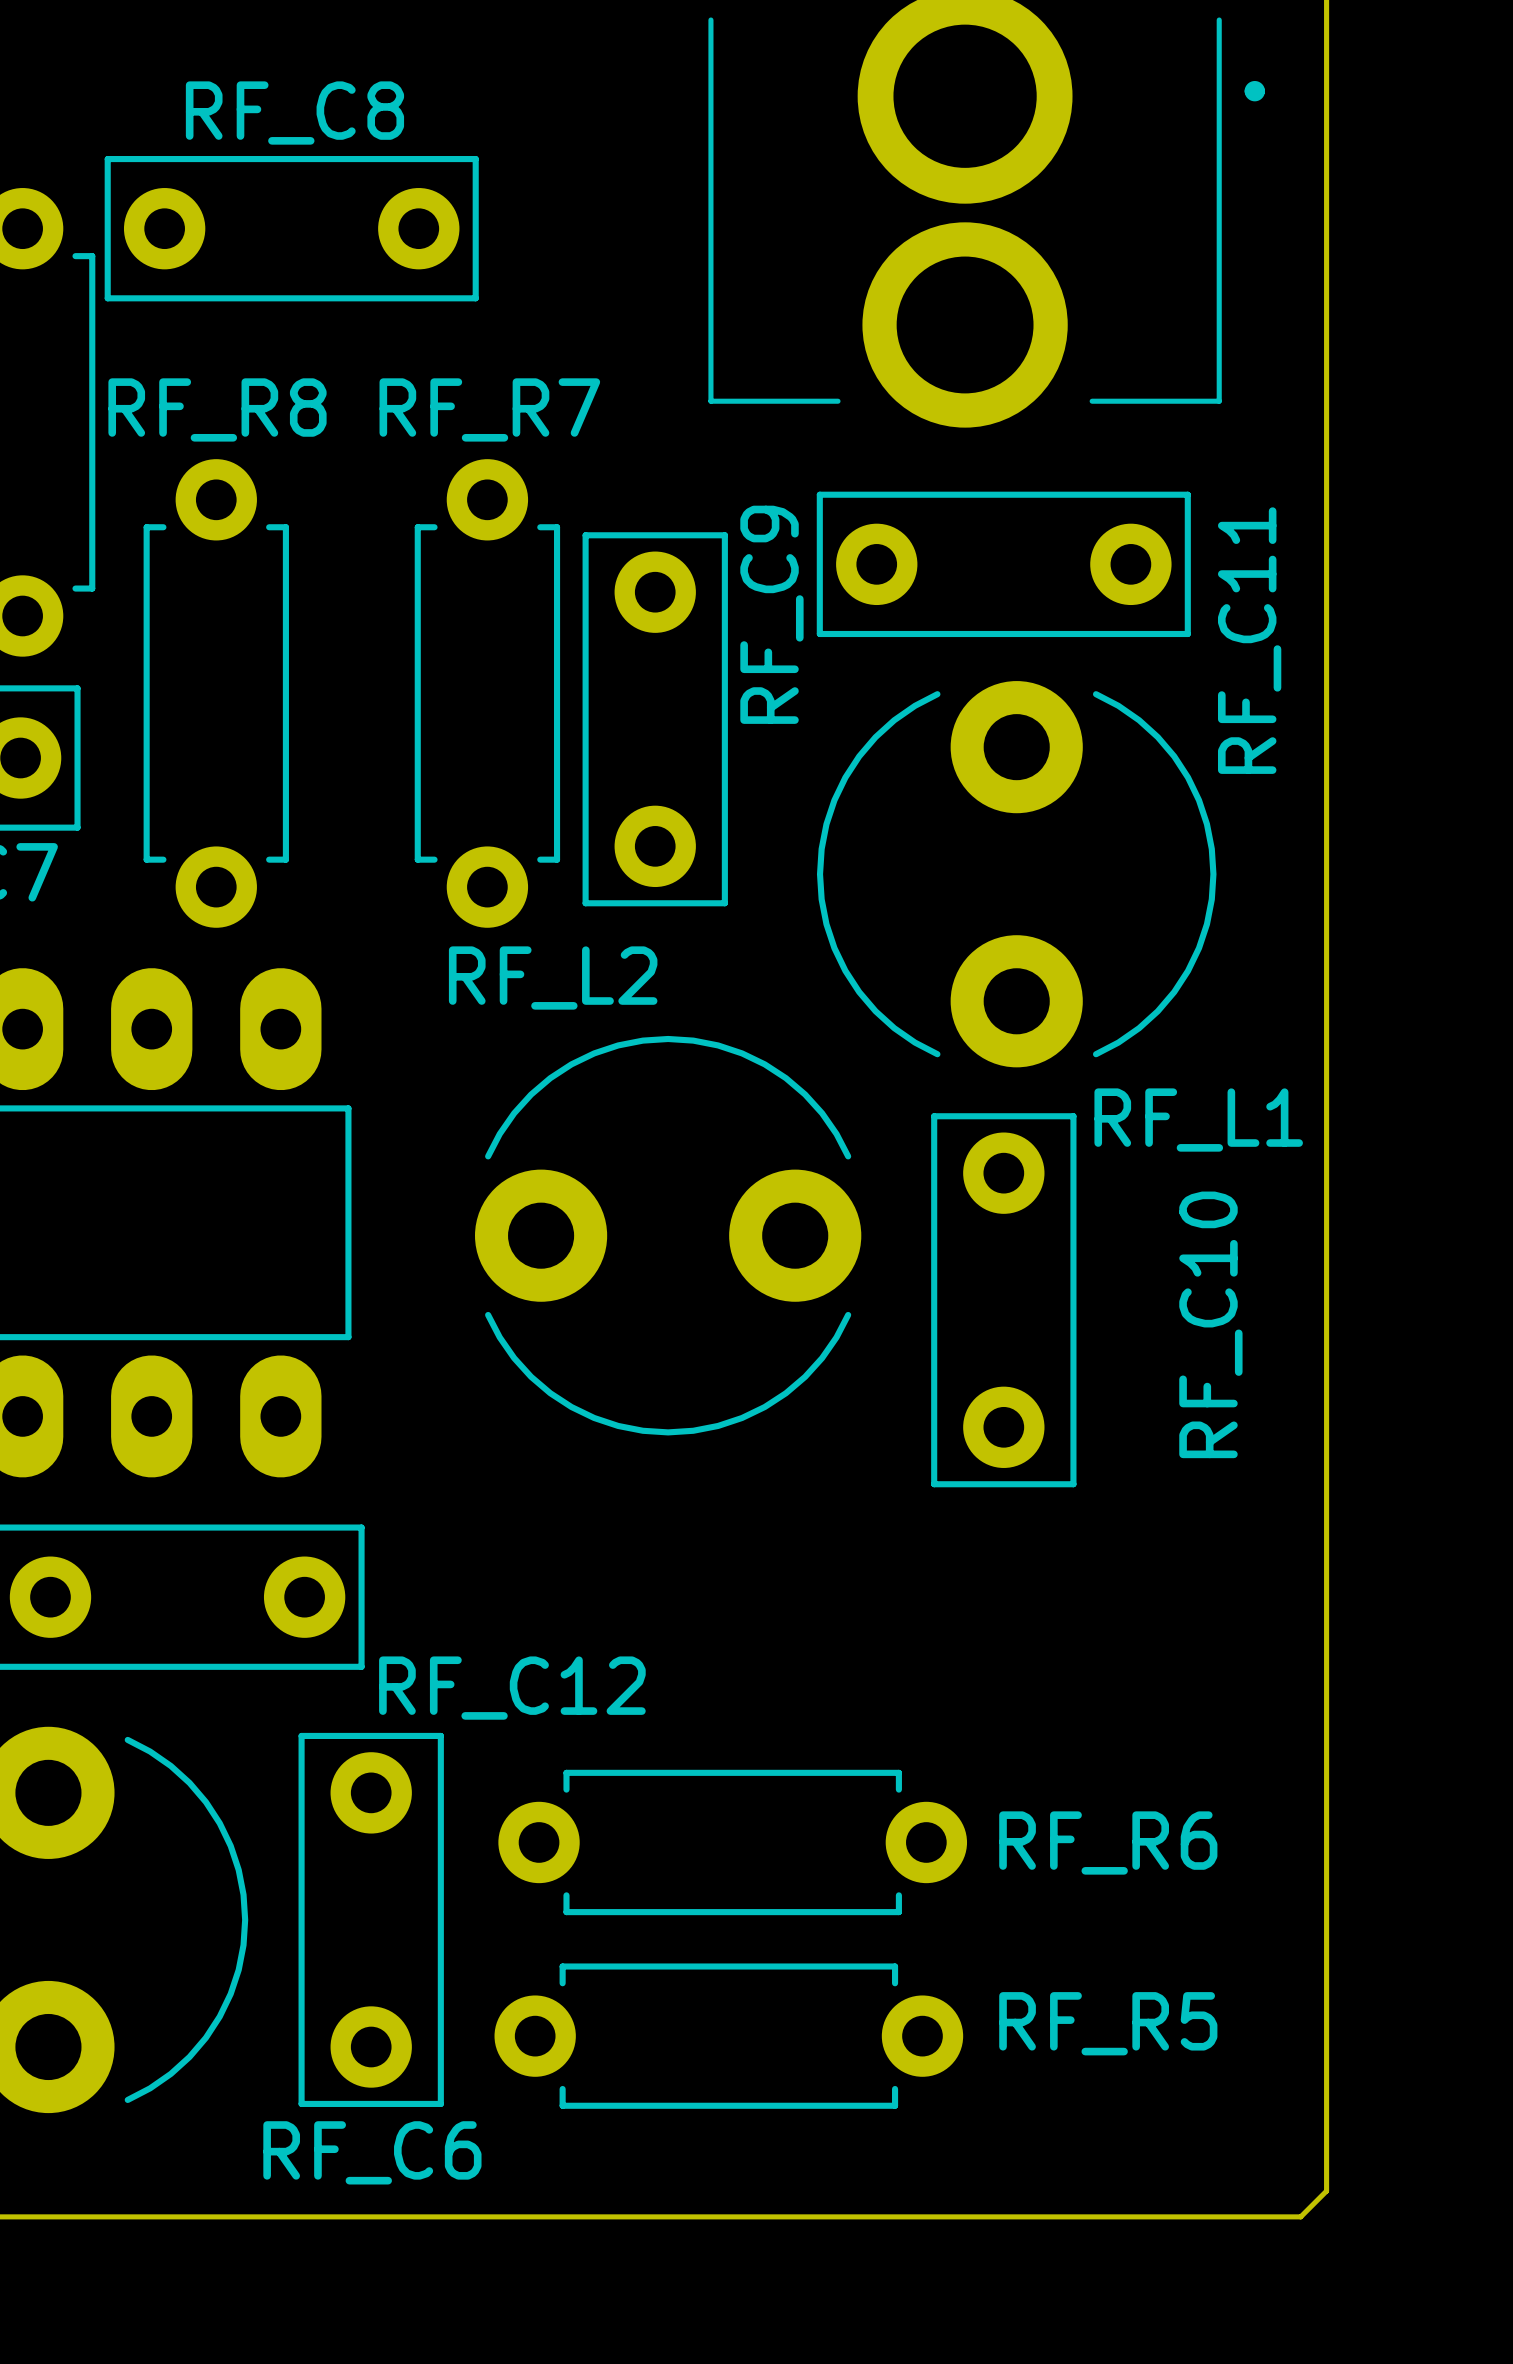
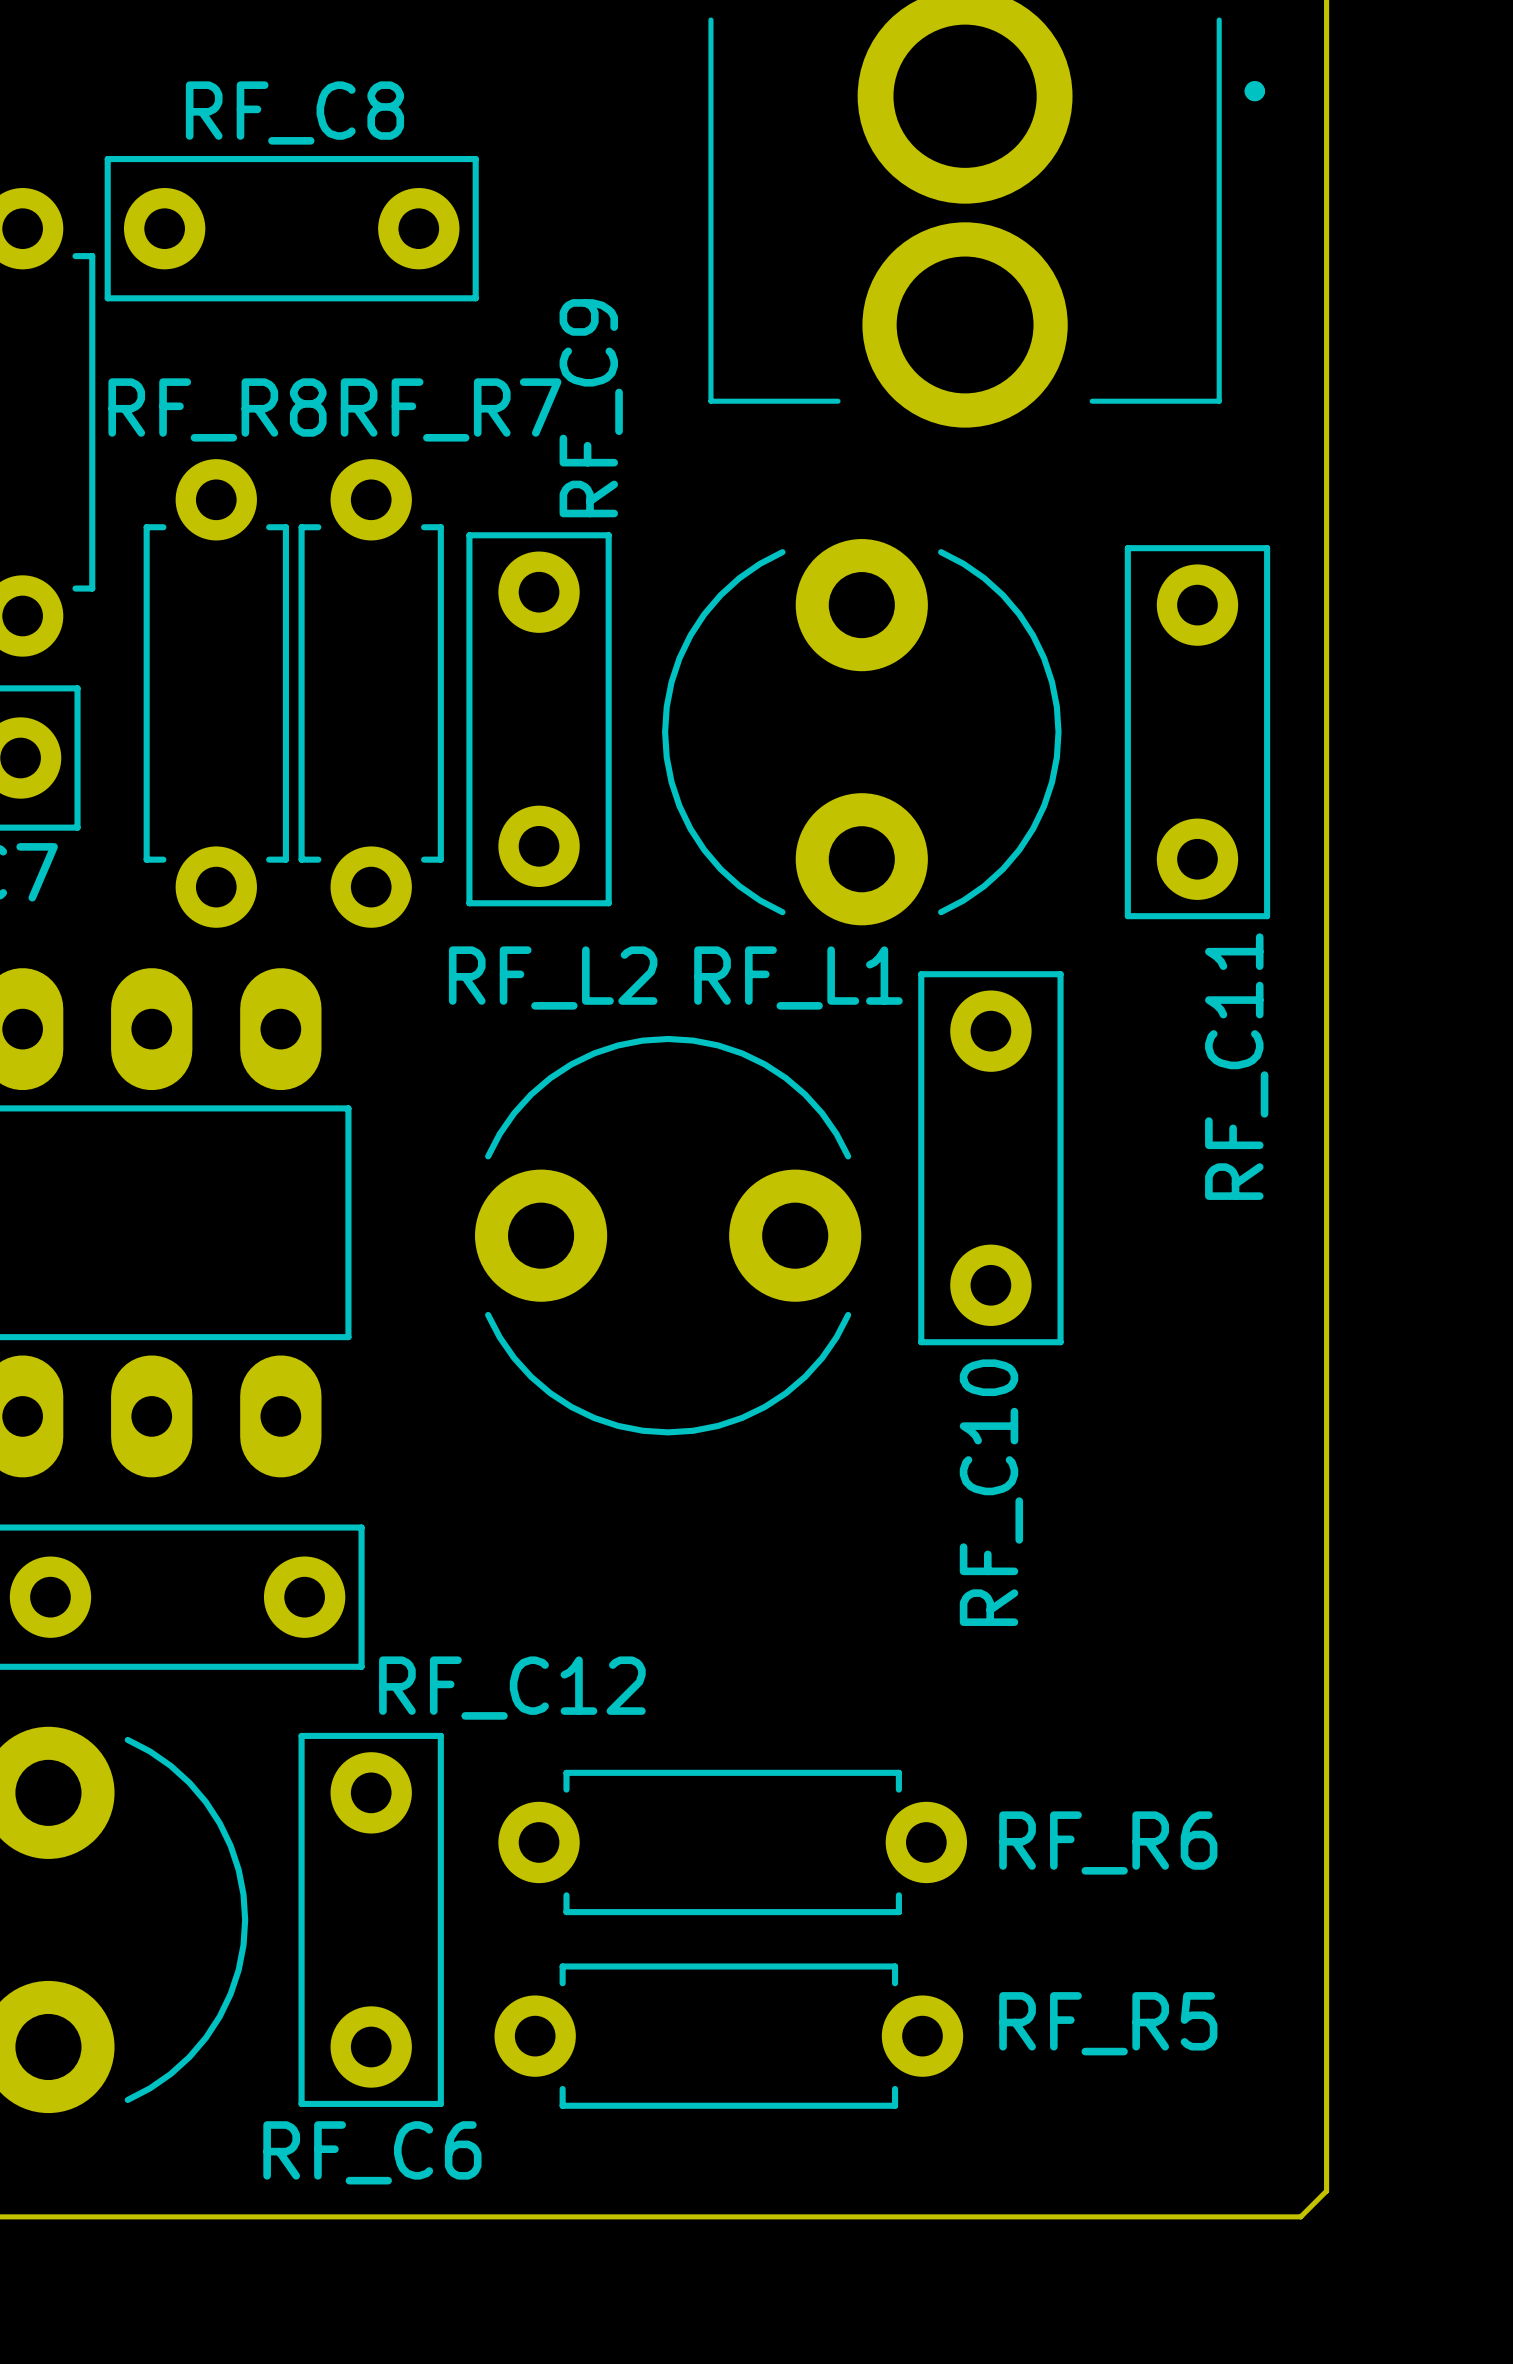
RF_R7 name position: RF_R7 (489, 409) -> RF_R7 (451, 409)
RF_C11 rotation: 0° (1003, 564) -> 90° clockwise (1197, 732)
RF_C11 position: (1003, 564) -> (1197, 732)
RF_C9 name position: RF_C9 (771, 614) -> RF_C9 (591, 408)
RF_C11 name position: RF_C11 (1249, 640) -> RF_C11 (1236, 1066)
RF_R7 position: (487, 693) -> (371, 693)
RF_C9 position: (655, 719) -> (539, 719)
RF_L1 position: (1016, 874) -> (861, 732)
RF_L1 name position: RF_L1 (1198, 1120) -> RF_L1 (798, 977)
RF_C10 position: (1003, 1300) -> (990, 1158)
RF_C10 name position: RF_C10 (1210, 1324) -> RF_C10 (991, 1492)

